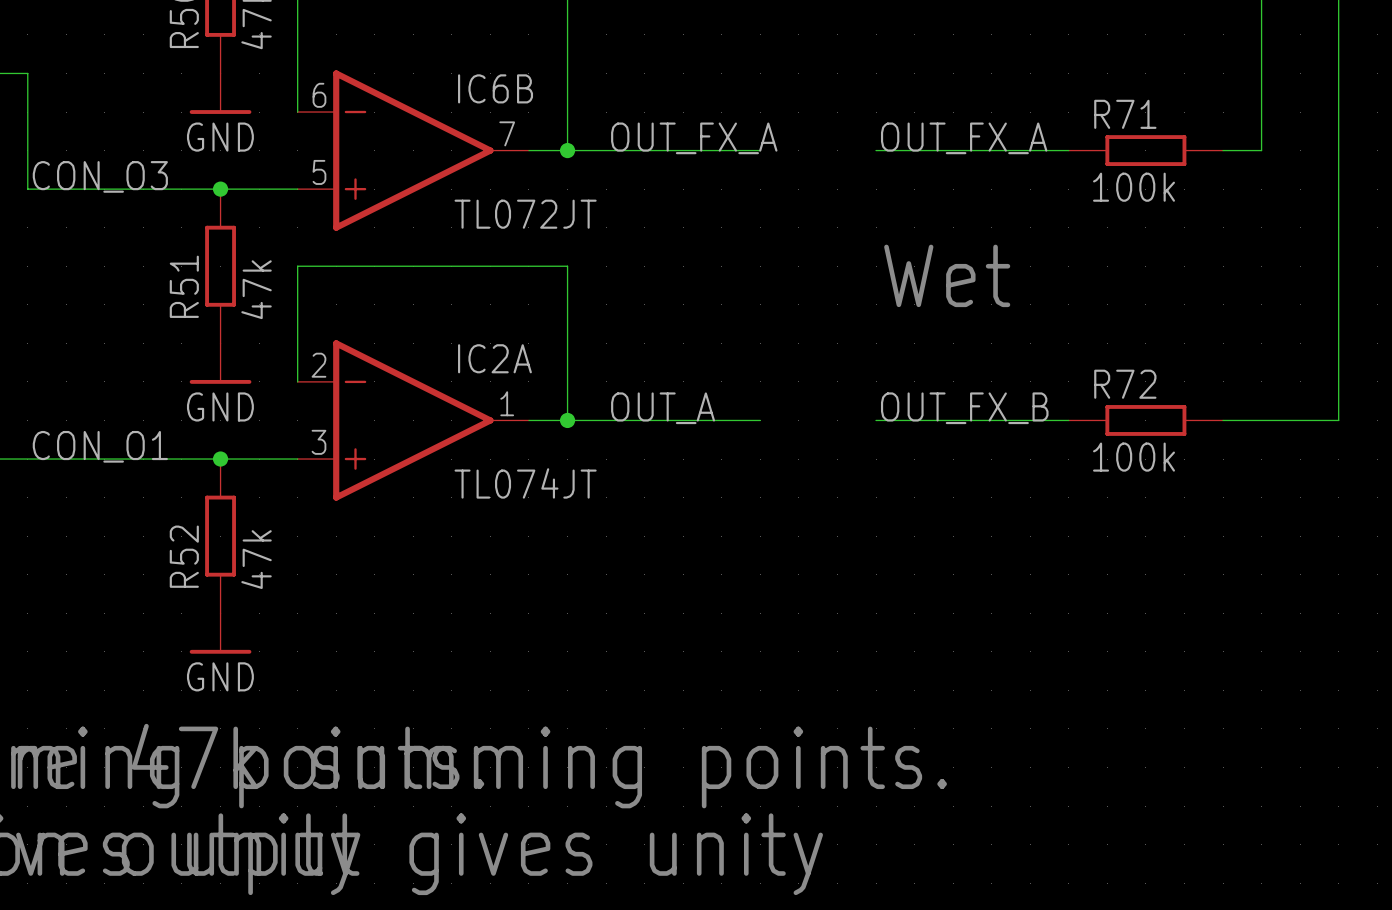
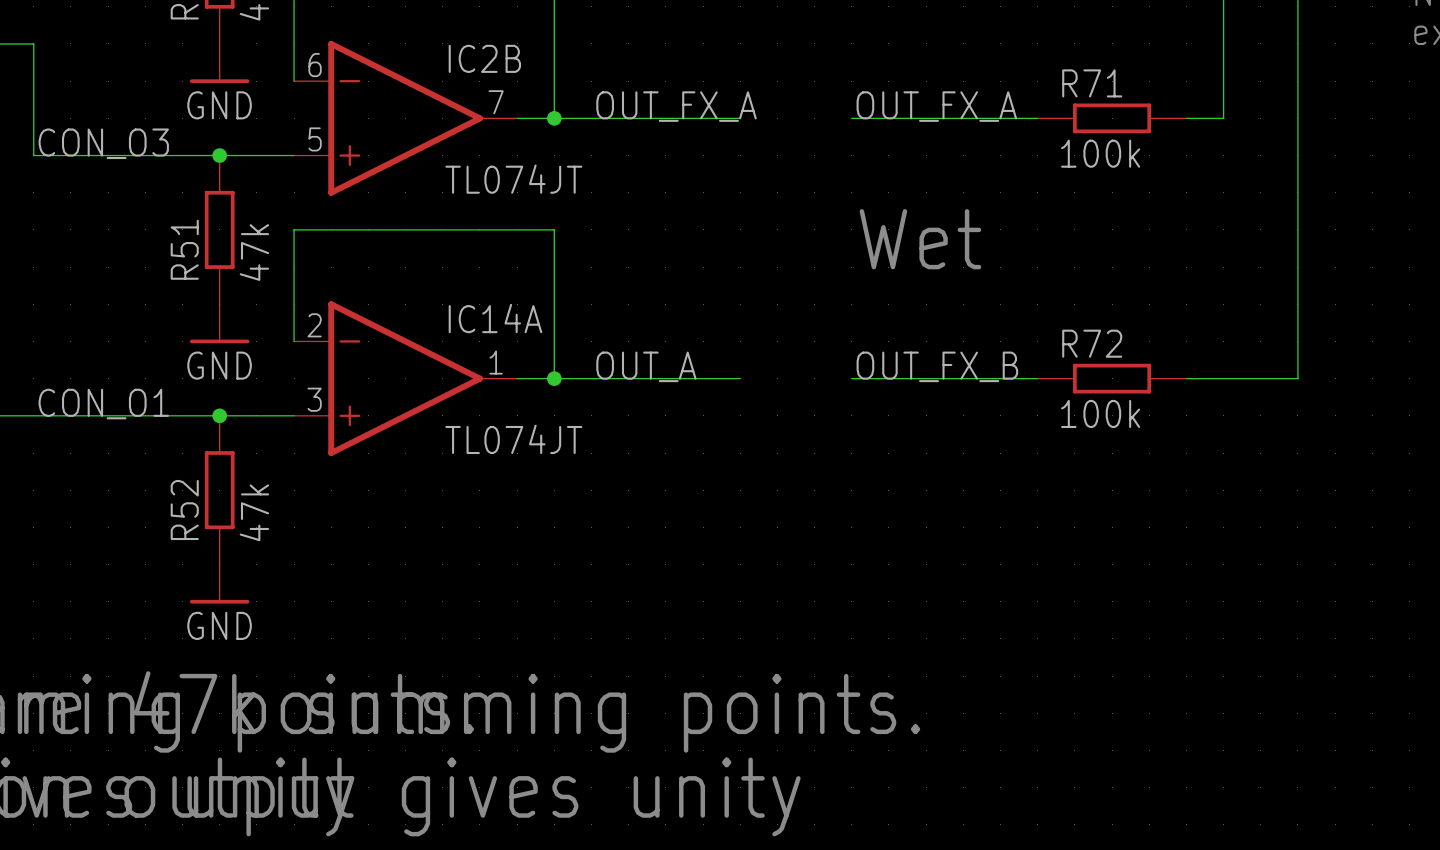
IC6B name: IC6B (495, 88) -> IC2B (484, 58)
IC6B value: TL072JT (525, 214) -> TL074JT (513, 179)
IC2A name: IC2A (494, 358) -> IC14A (495, 318)

